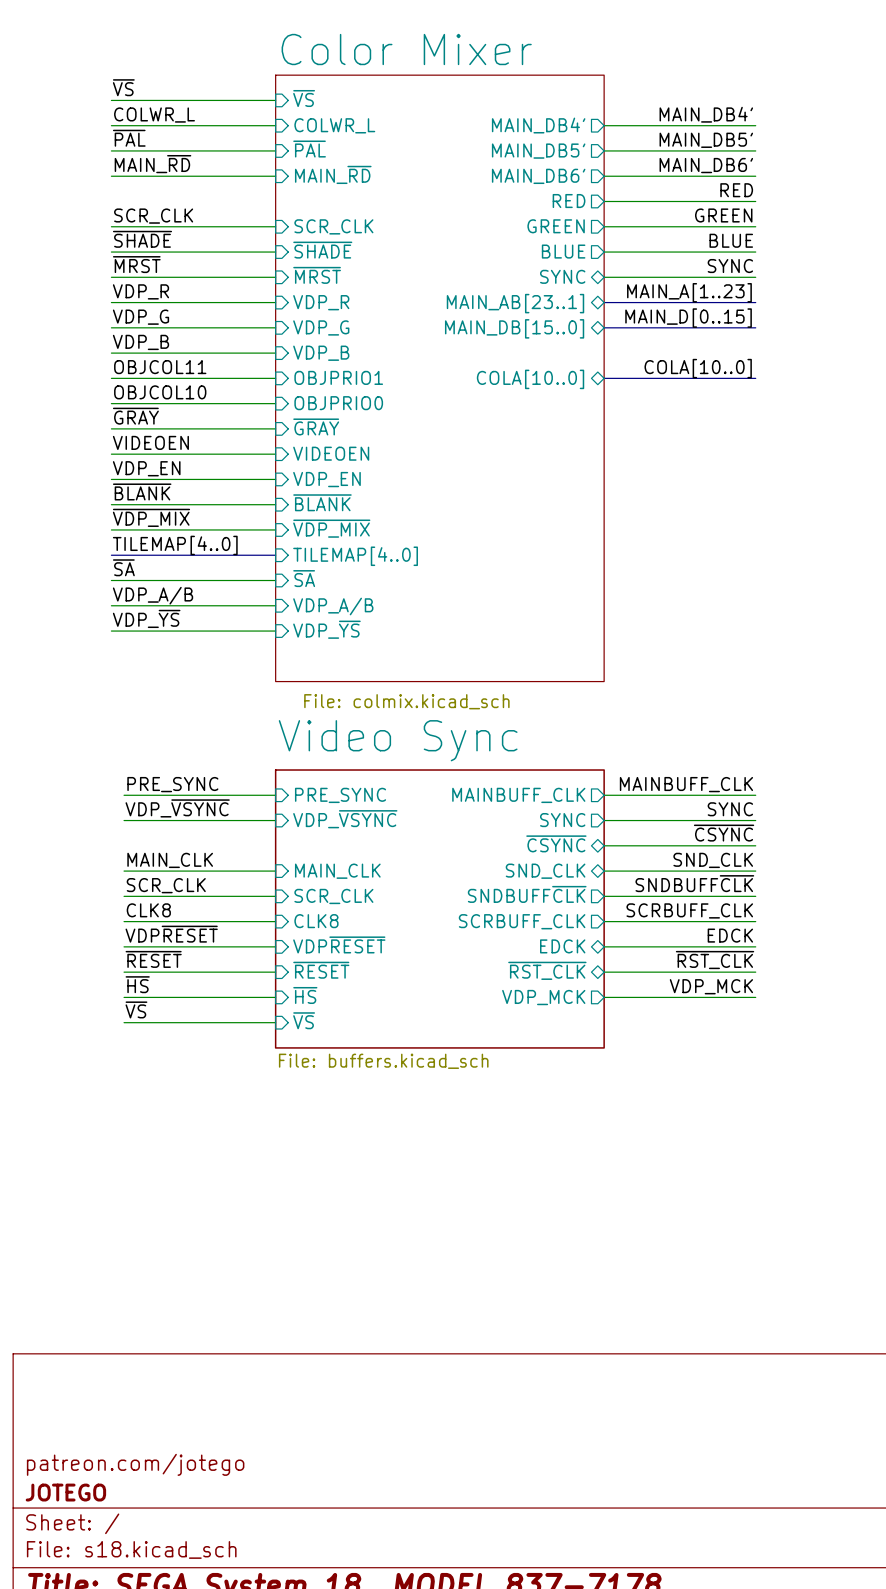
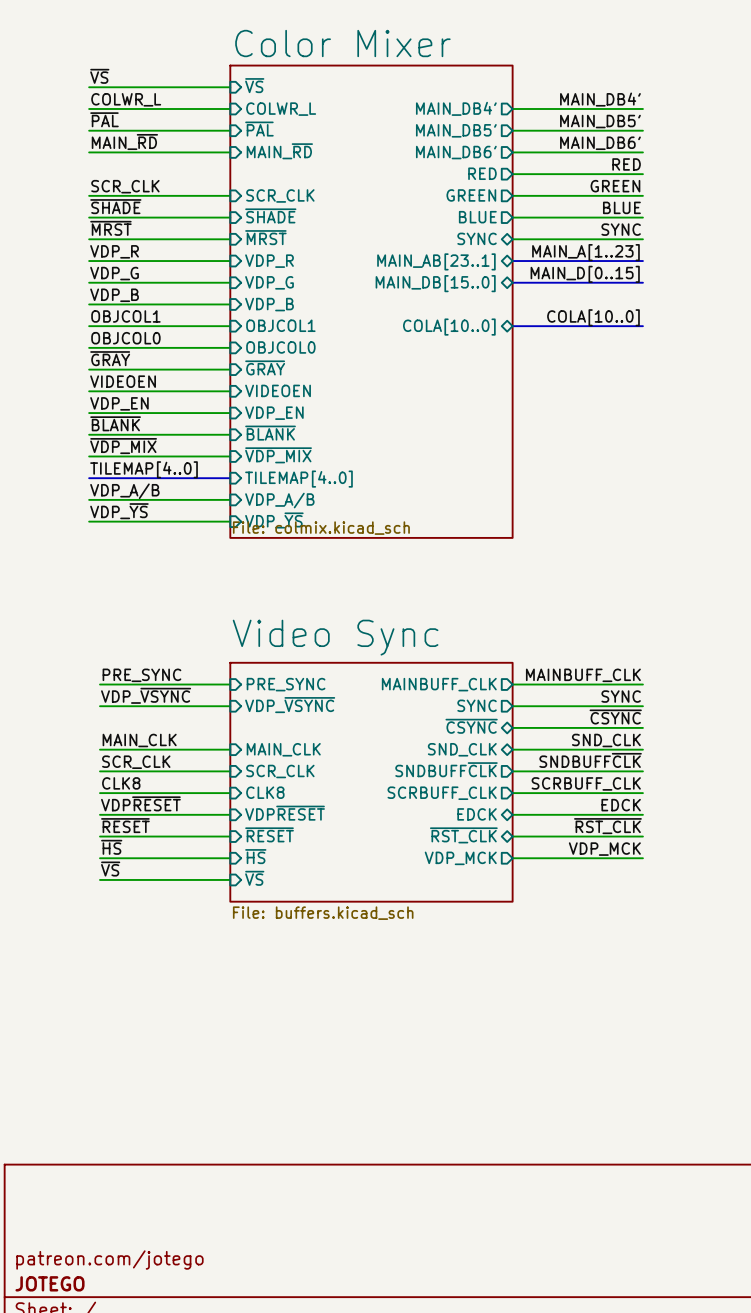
sheet Color Mixer: none -> File: colmix.kicad_sch (371, 301)
label: OBJCOL11 (160, 367) -> OBJCOL1 (125, 316)
sheet pin: OBJPRIO1 (338, 377) -> OBJCOL1 (280, 325)
sheet Color Mixer: File: colmix.kicad_sch (439, 378) -> none
label: OBJCOL10 (160, 392) -> OBJCOL0 (125, 338)
sheet pin: OBJPRIO0 (338, 403) -> OBJCOL0 (280, 347)
label: ~{SA} (123, 567) -> VDP_A/B (124, 491)
sheet pin: ~{SA} (304, 578) -> VDP_A/B (279, 500)
label: VDP_A/B (153, 595) -> VDP_~{YS} (119, 511)
sheet pin: VDP_A/B (333, 606) -> VDP_~{YS} (274, 520)
label: VDP_~{YS} (146, 618) -> none
sheet pin: VDP_~{YS} (326, 629) -> none
wire: (111, 631) (275, 631) -> none

